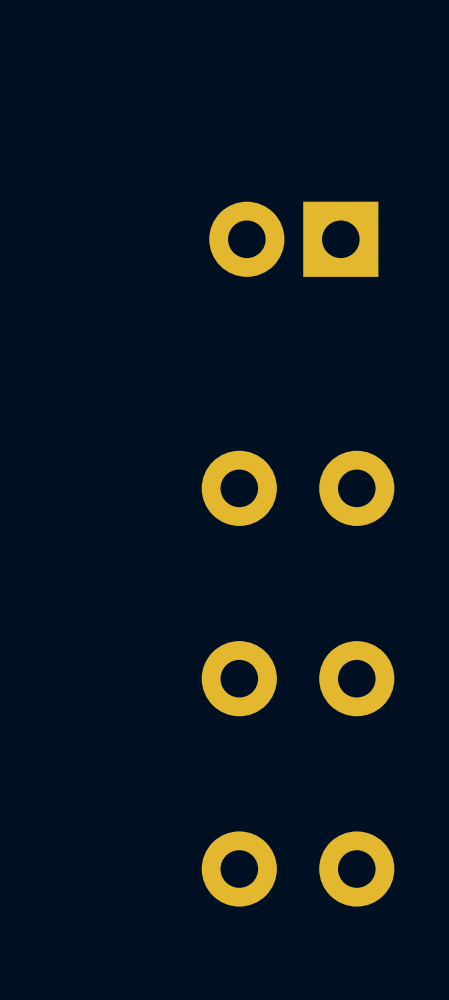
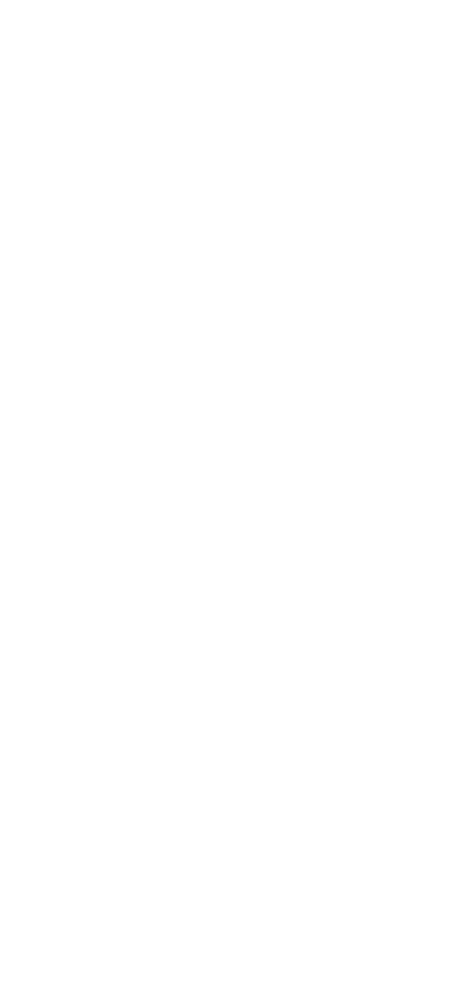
part: (293, 239) -> none
part: (298, 488) -> none
part: (298, 678) -> none
part: (298, 869) -> none

